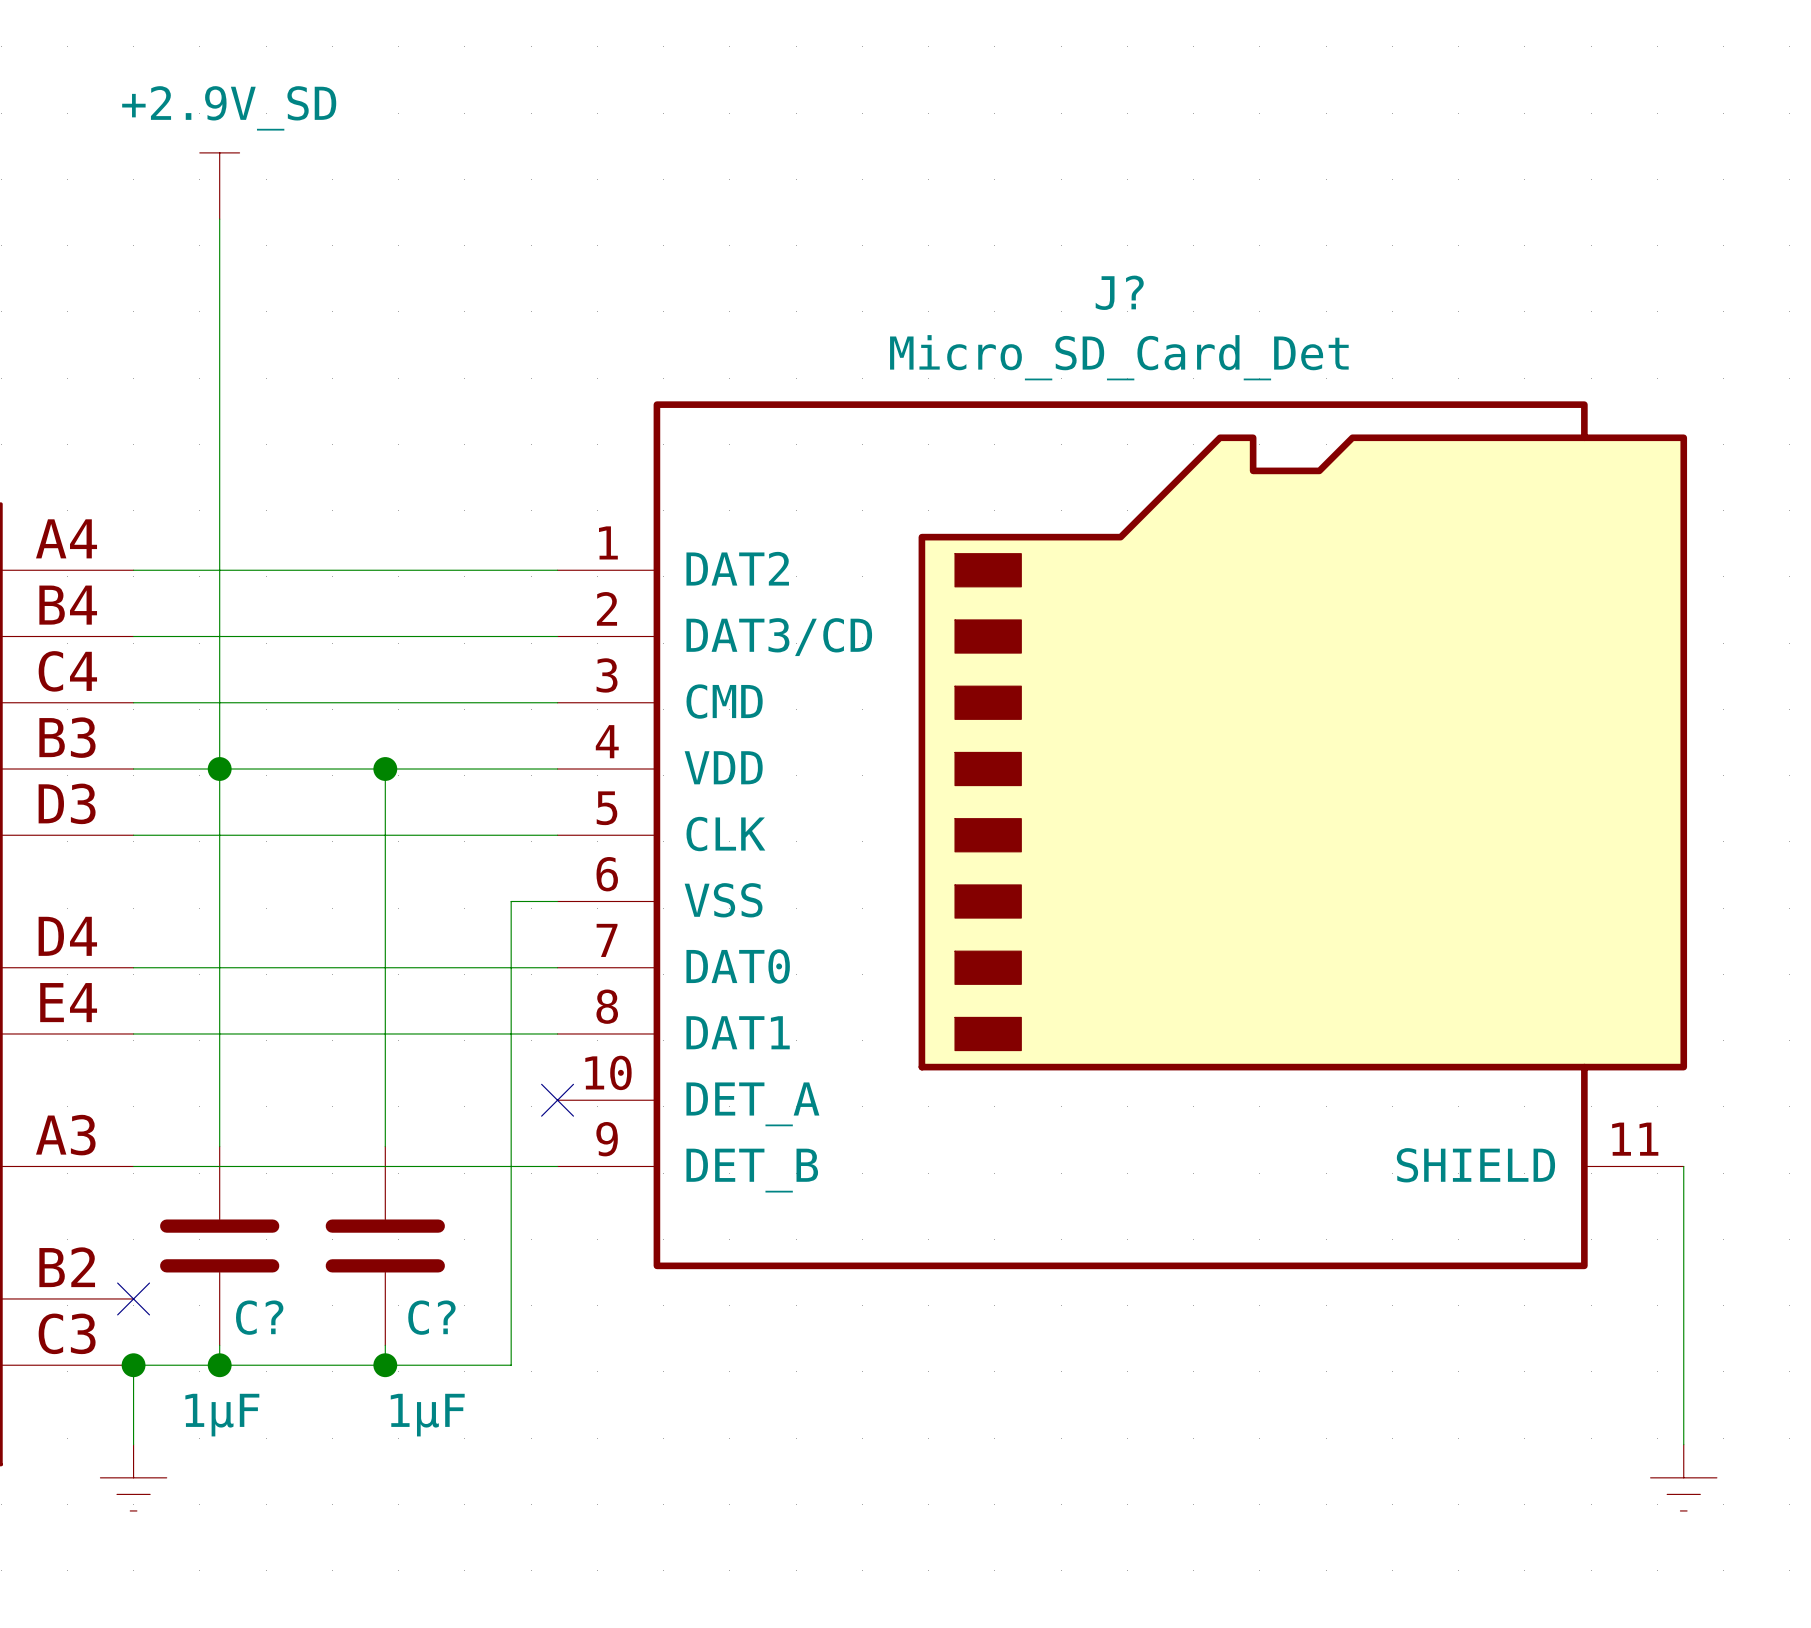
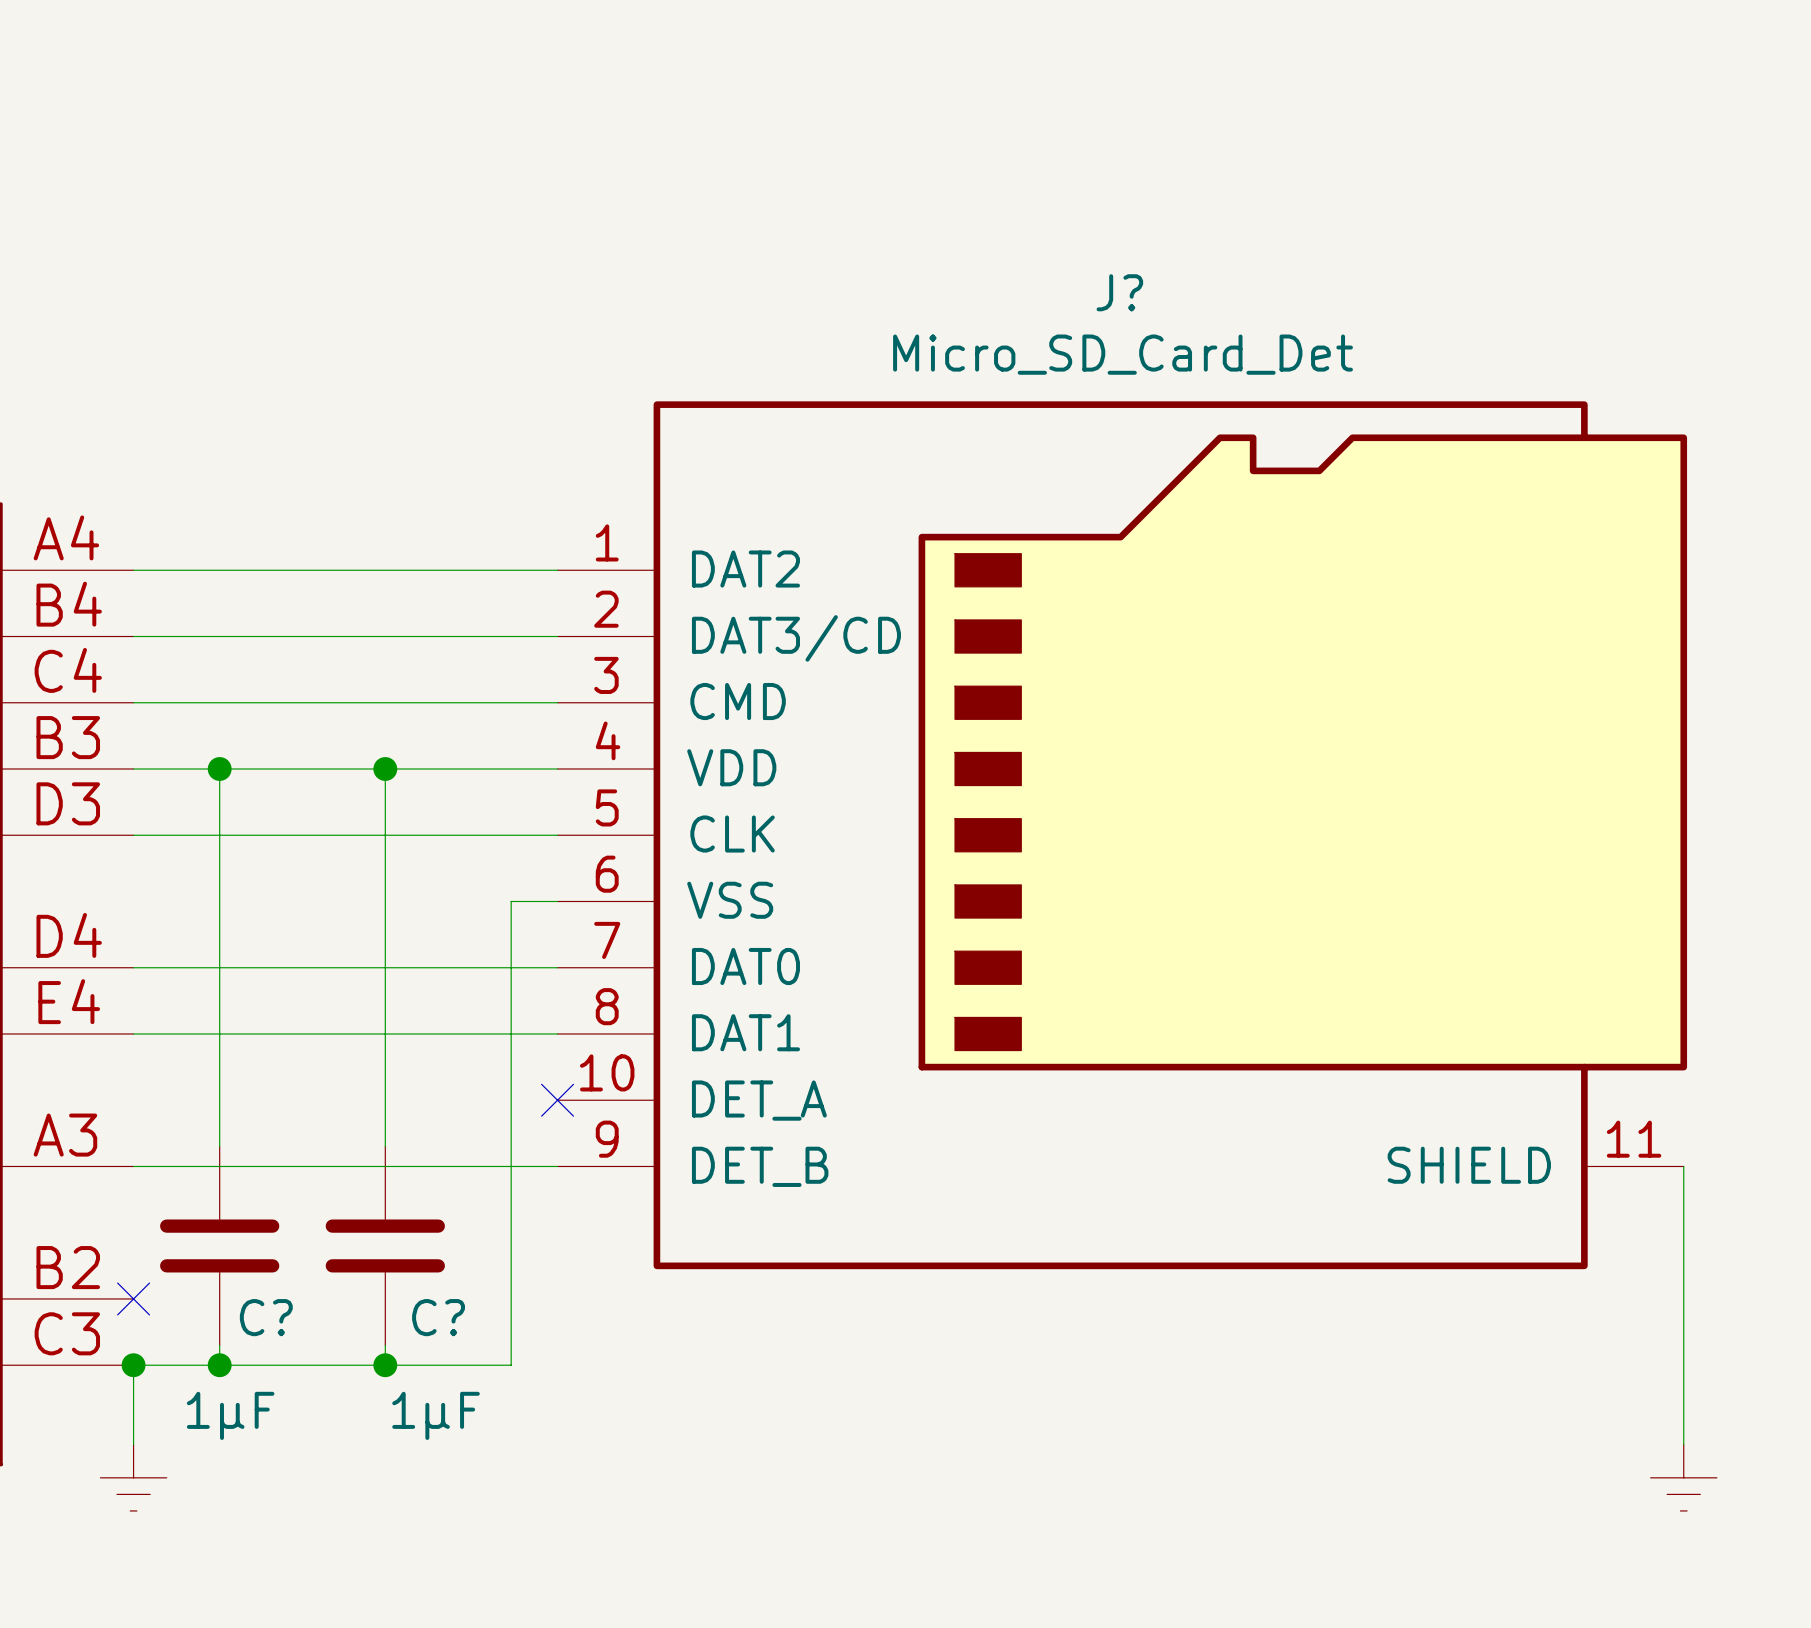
power symbol: +2.9V_SD (219, 186) -> none
wire: (219, 219) (219, 769) -> none

